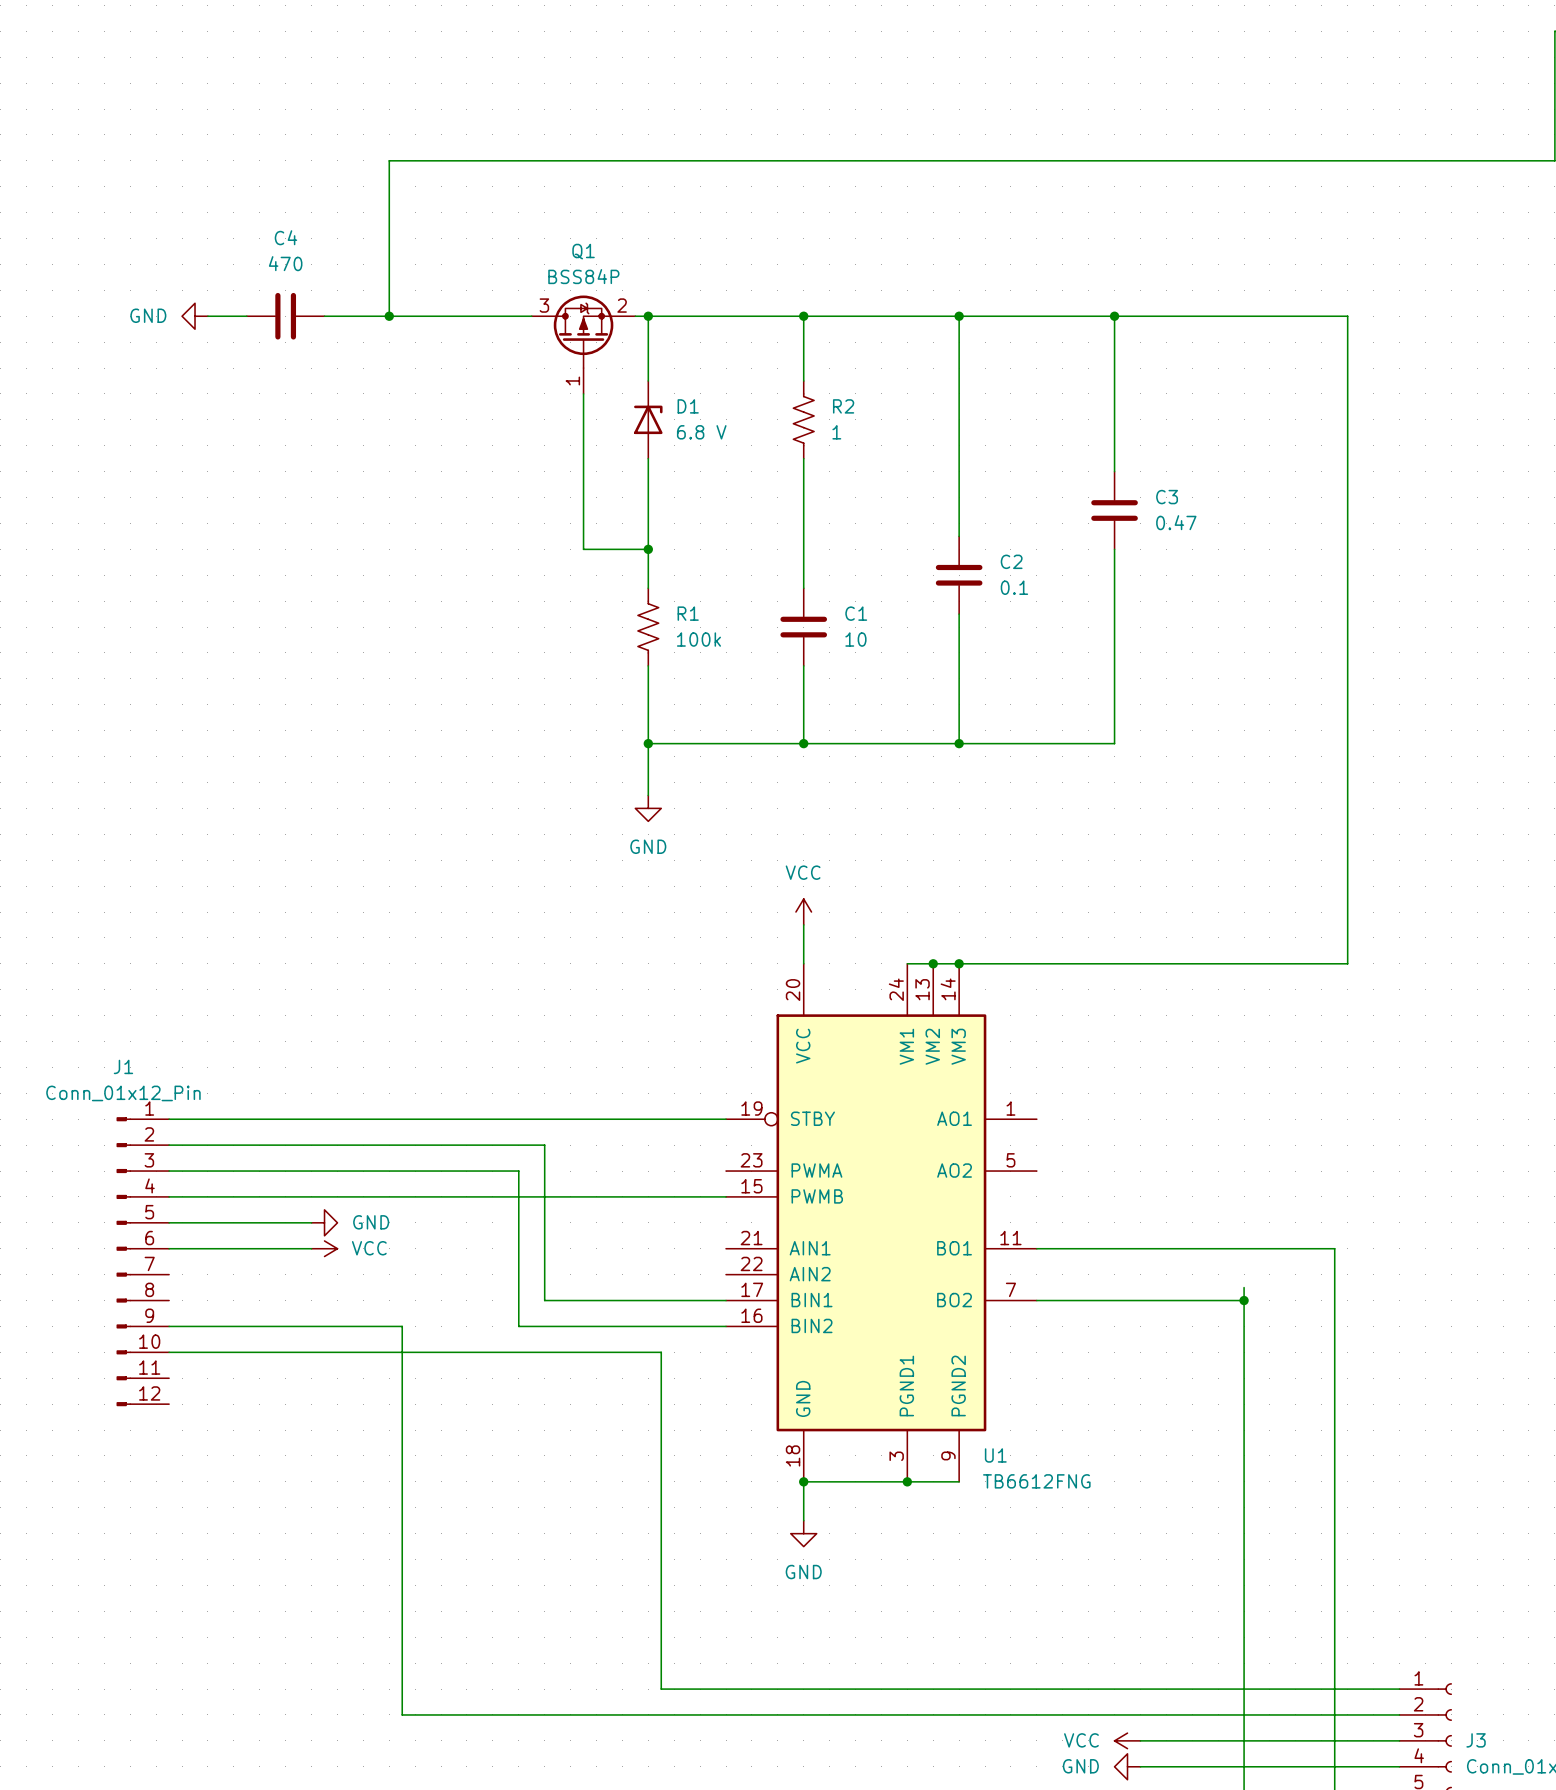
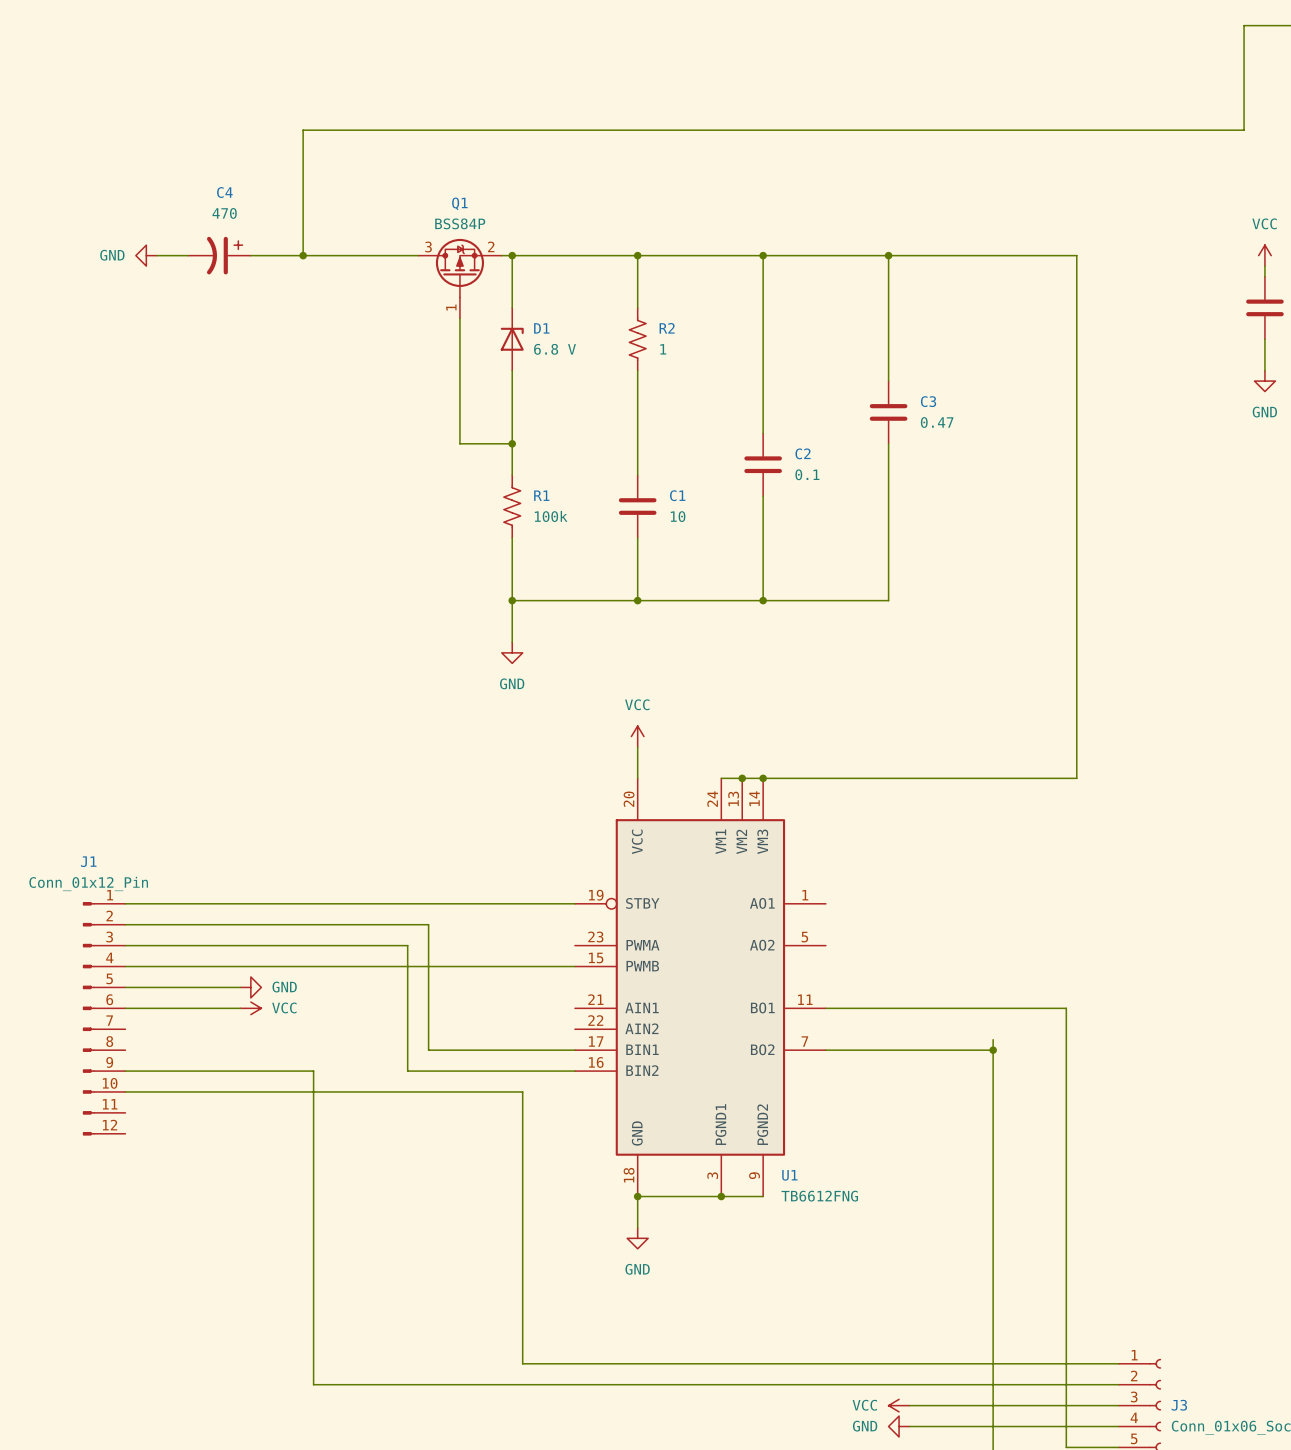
C4 symbol: [246, 292, 325, 340] -> [188, 236, 251, 275]

